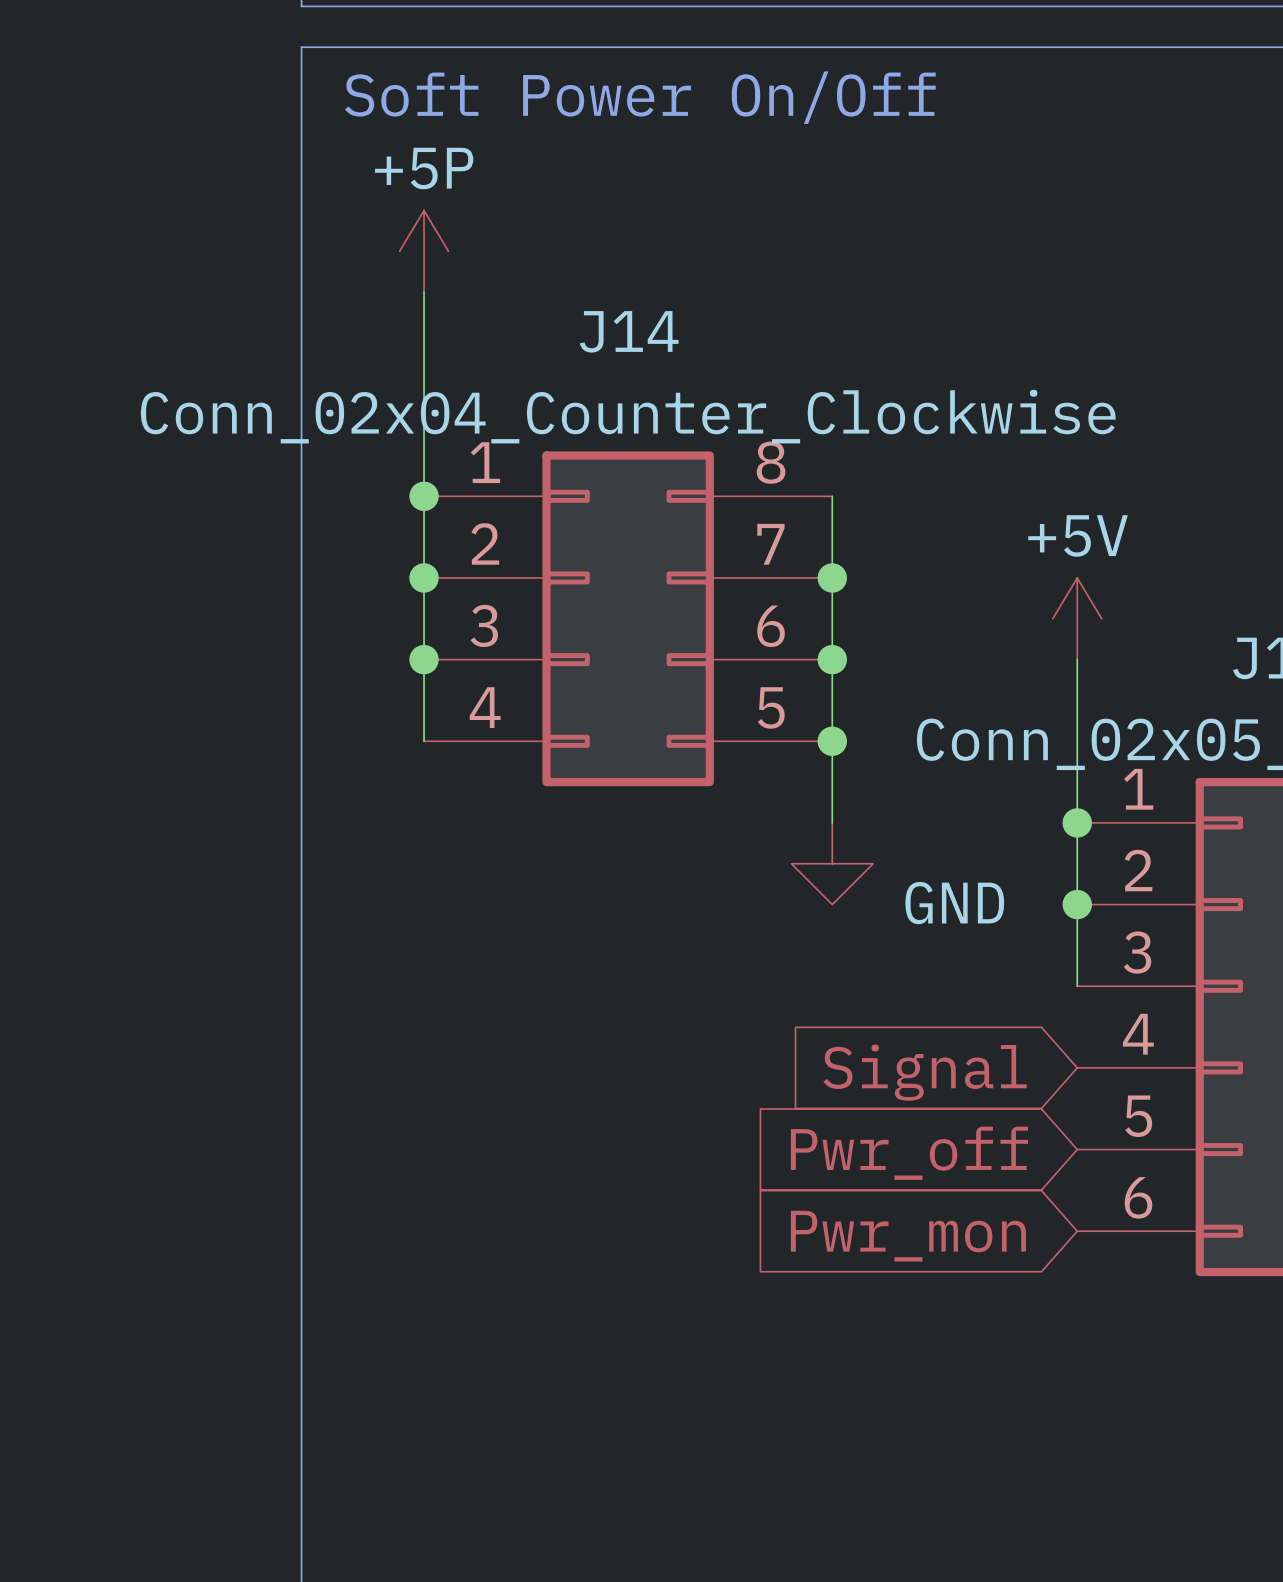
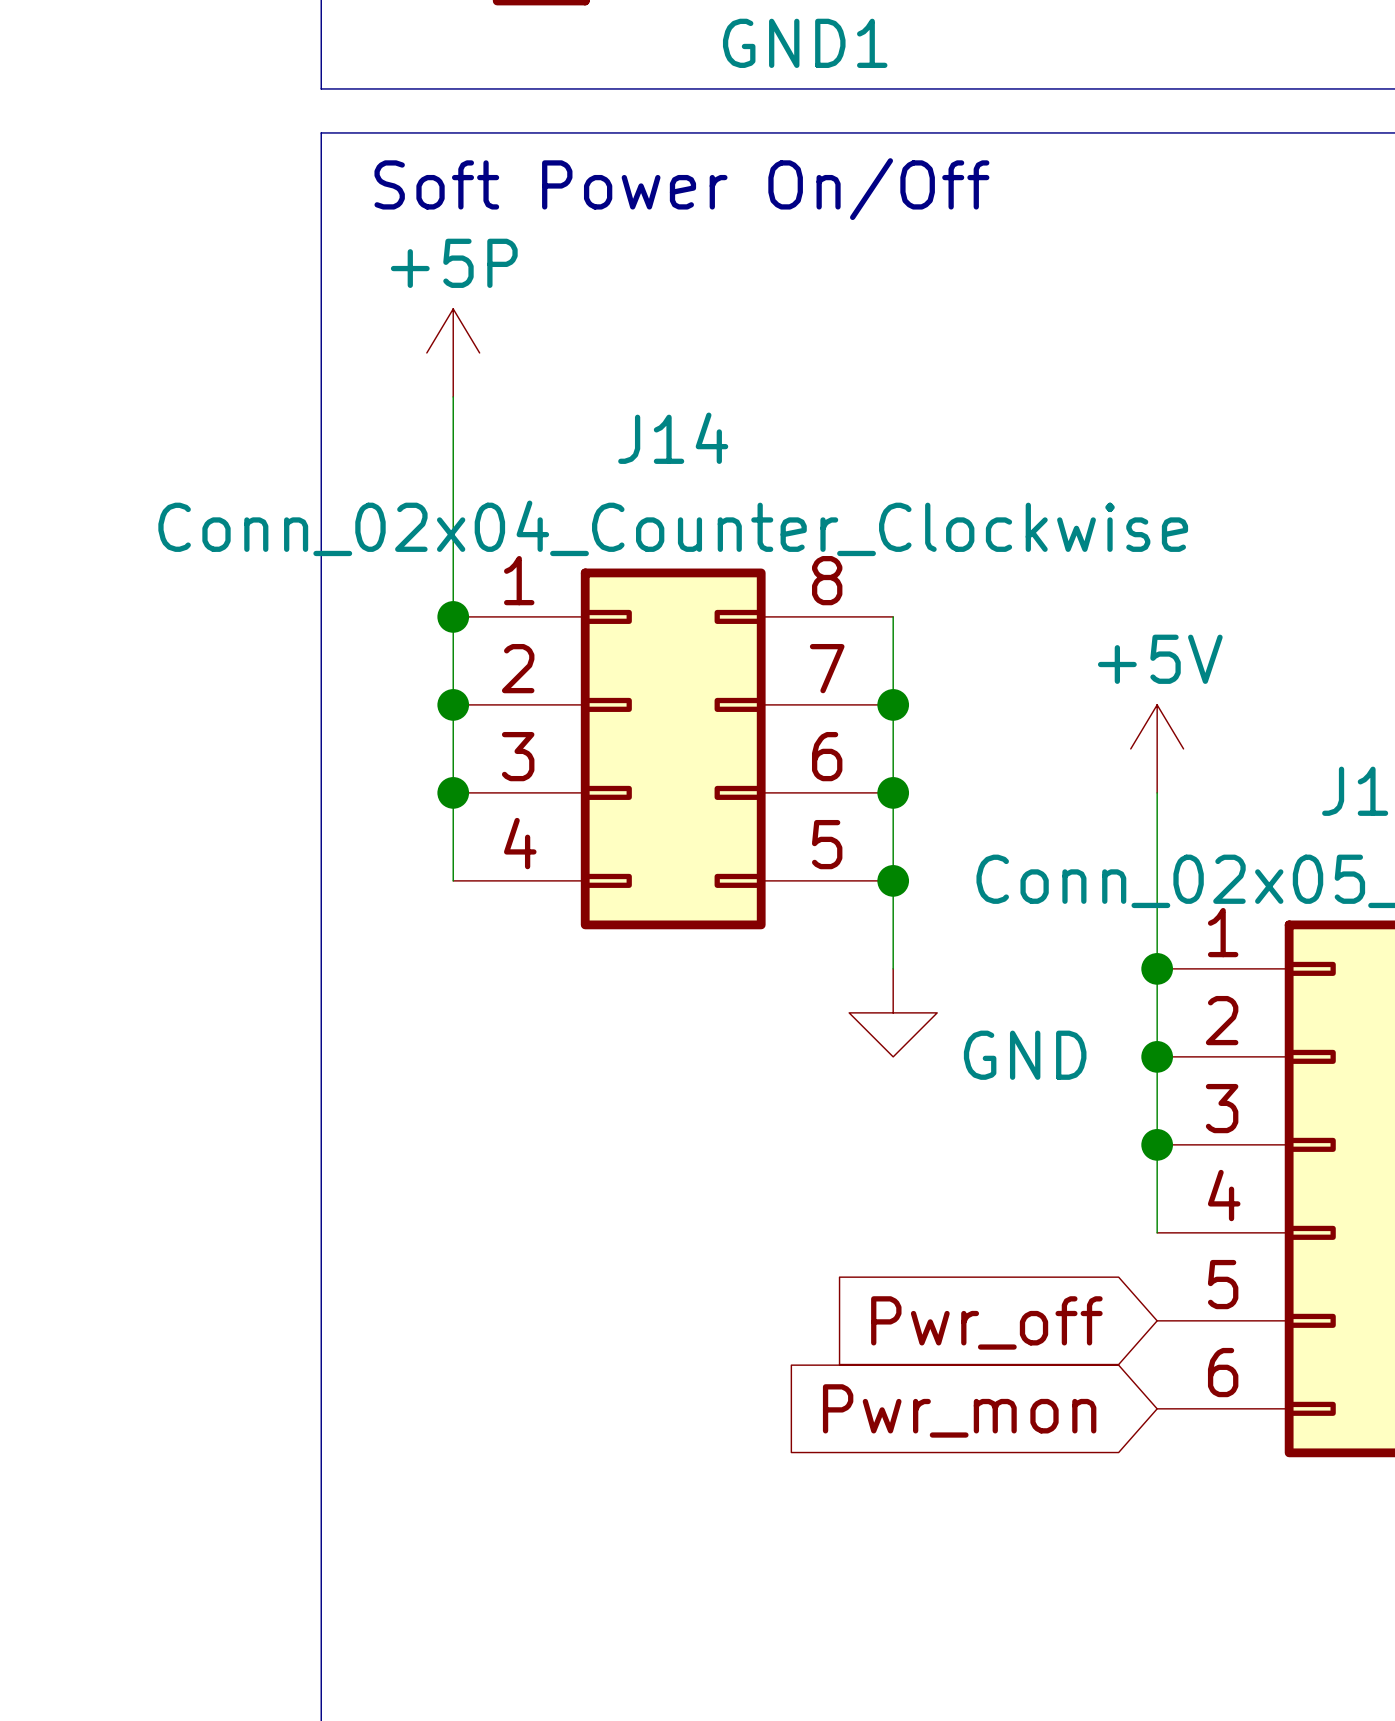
wire: none -> (1157, 1144) (1157, 1232)
junction: none -> (1157, 1144)
global label: Signal (925, 1072) -> none

